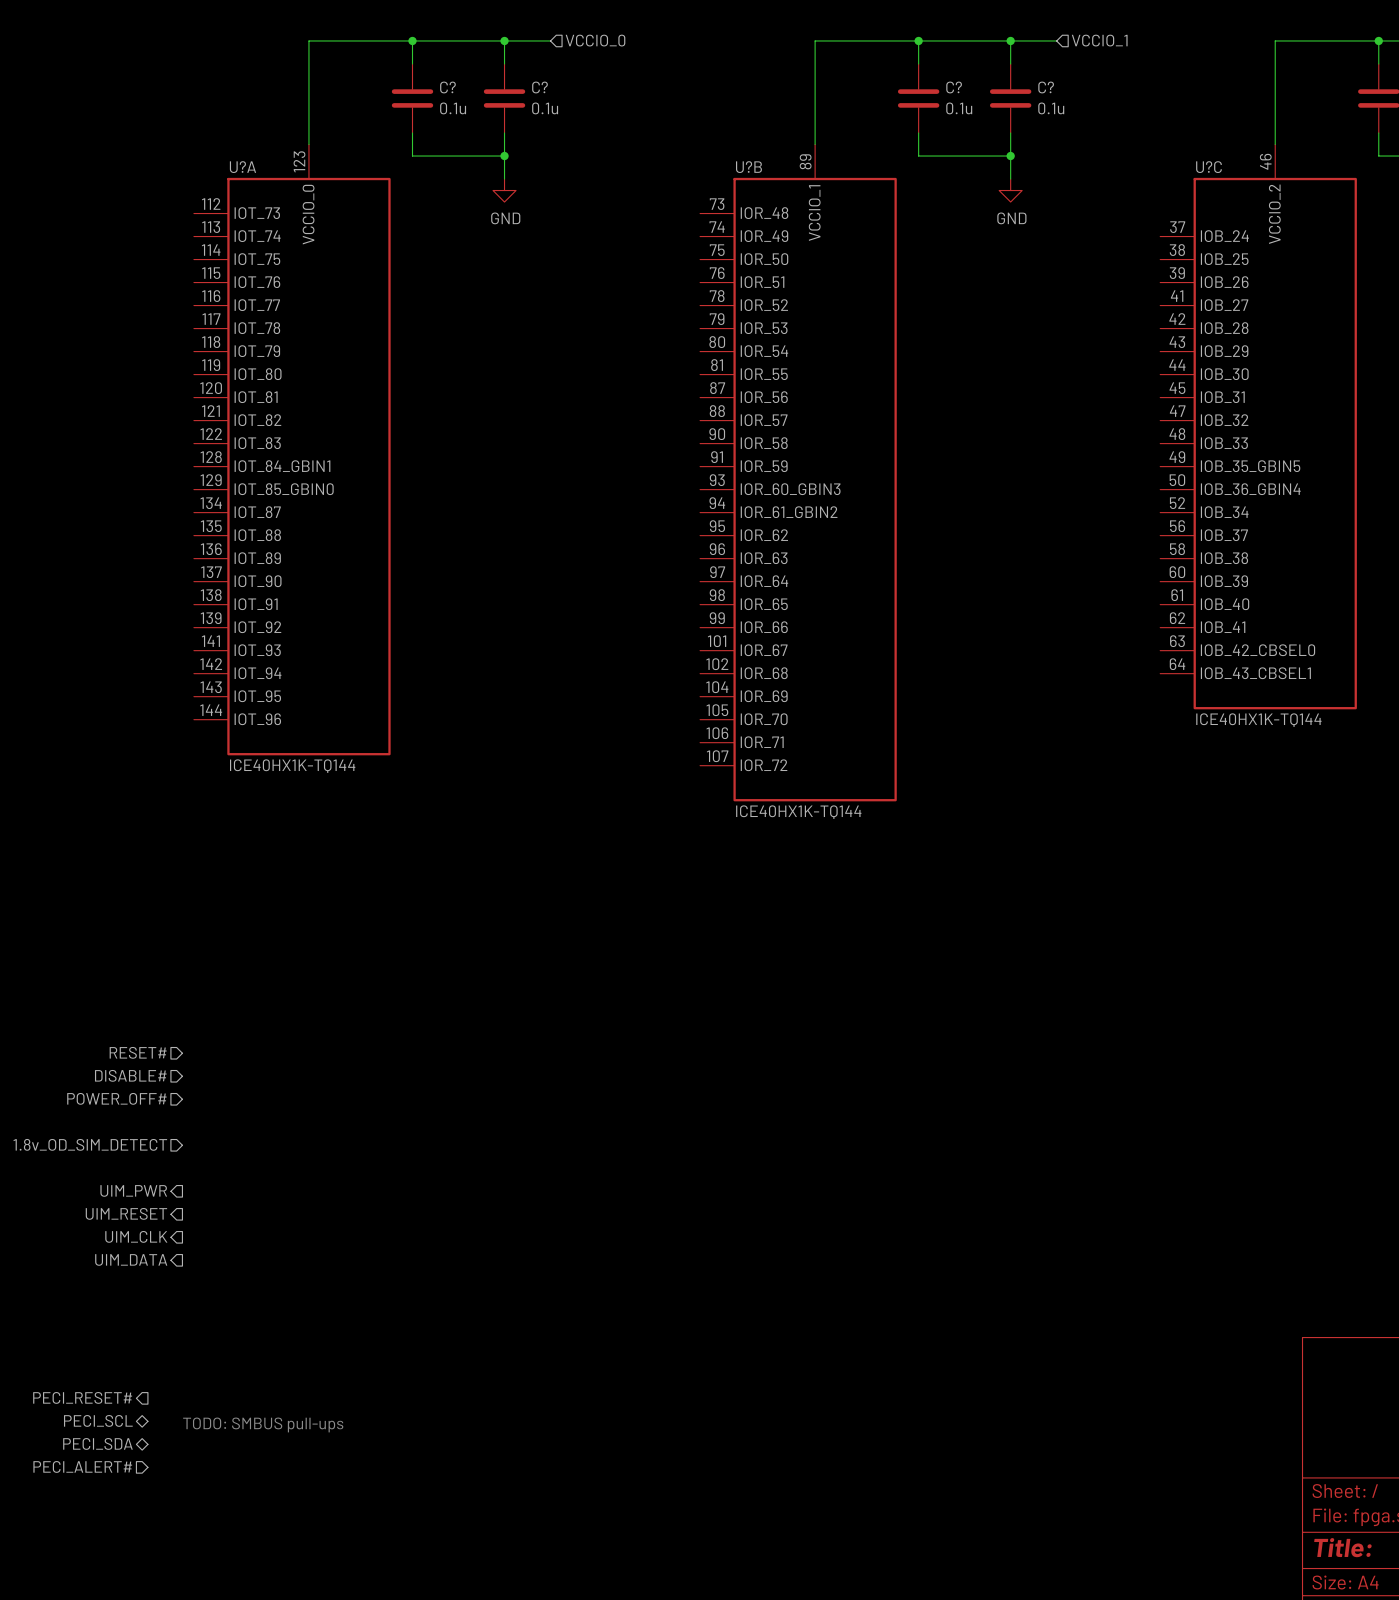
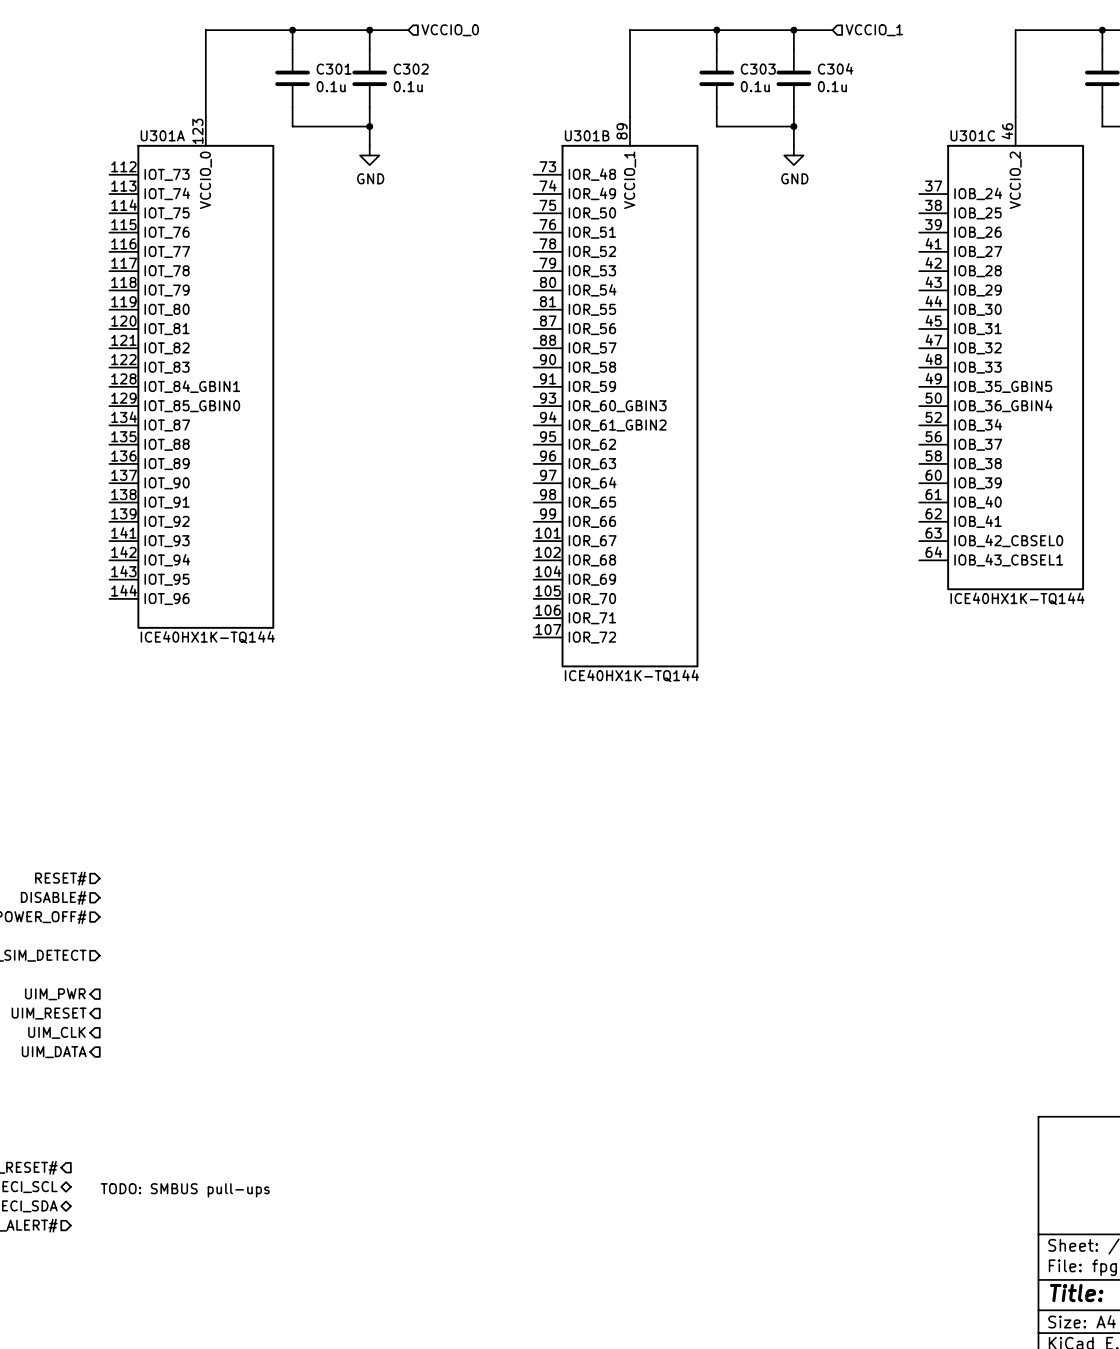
C? name: C? (447, 87) -> C301 (334, 69)
C? name: C? (539, 87) -> C302 (411, 69)
C? name: C? (954, 87) -> C303 (758, 69)
C? name: C? (1046, 87) -> C304 (835, 68)
U?A name: U?A (242, 167) -> U301A (162, 135)
U?B name: U?B (748, 167) -> U301B (587, 135)
U?C name: U?C (1208, 167) -> U301C (972, 135)

